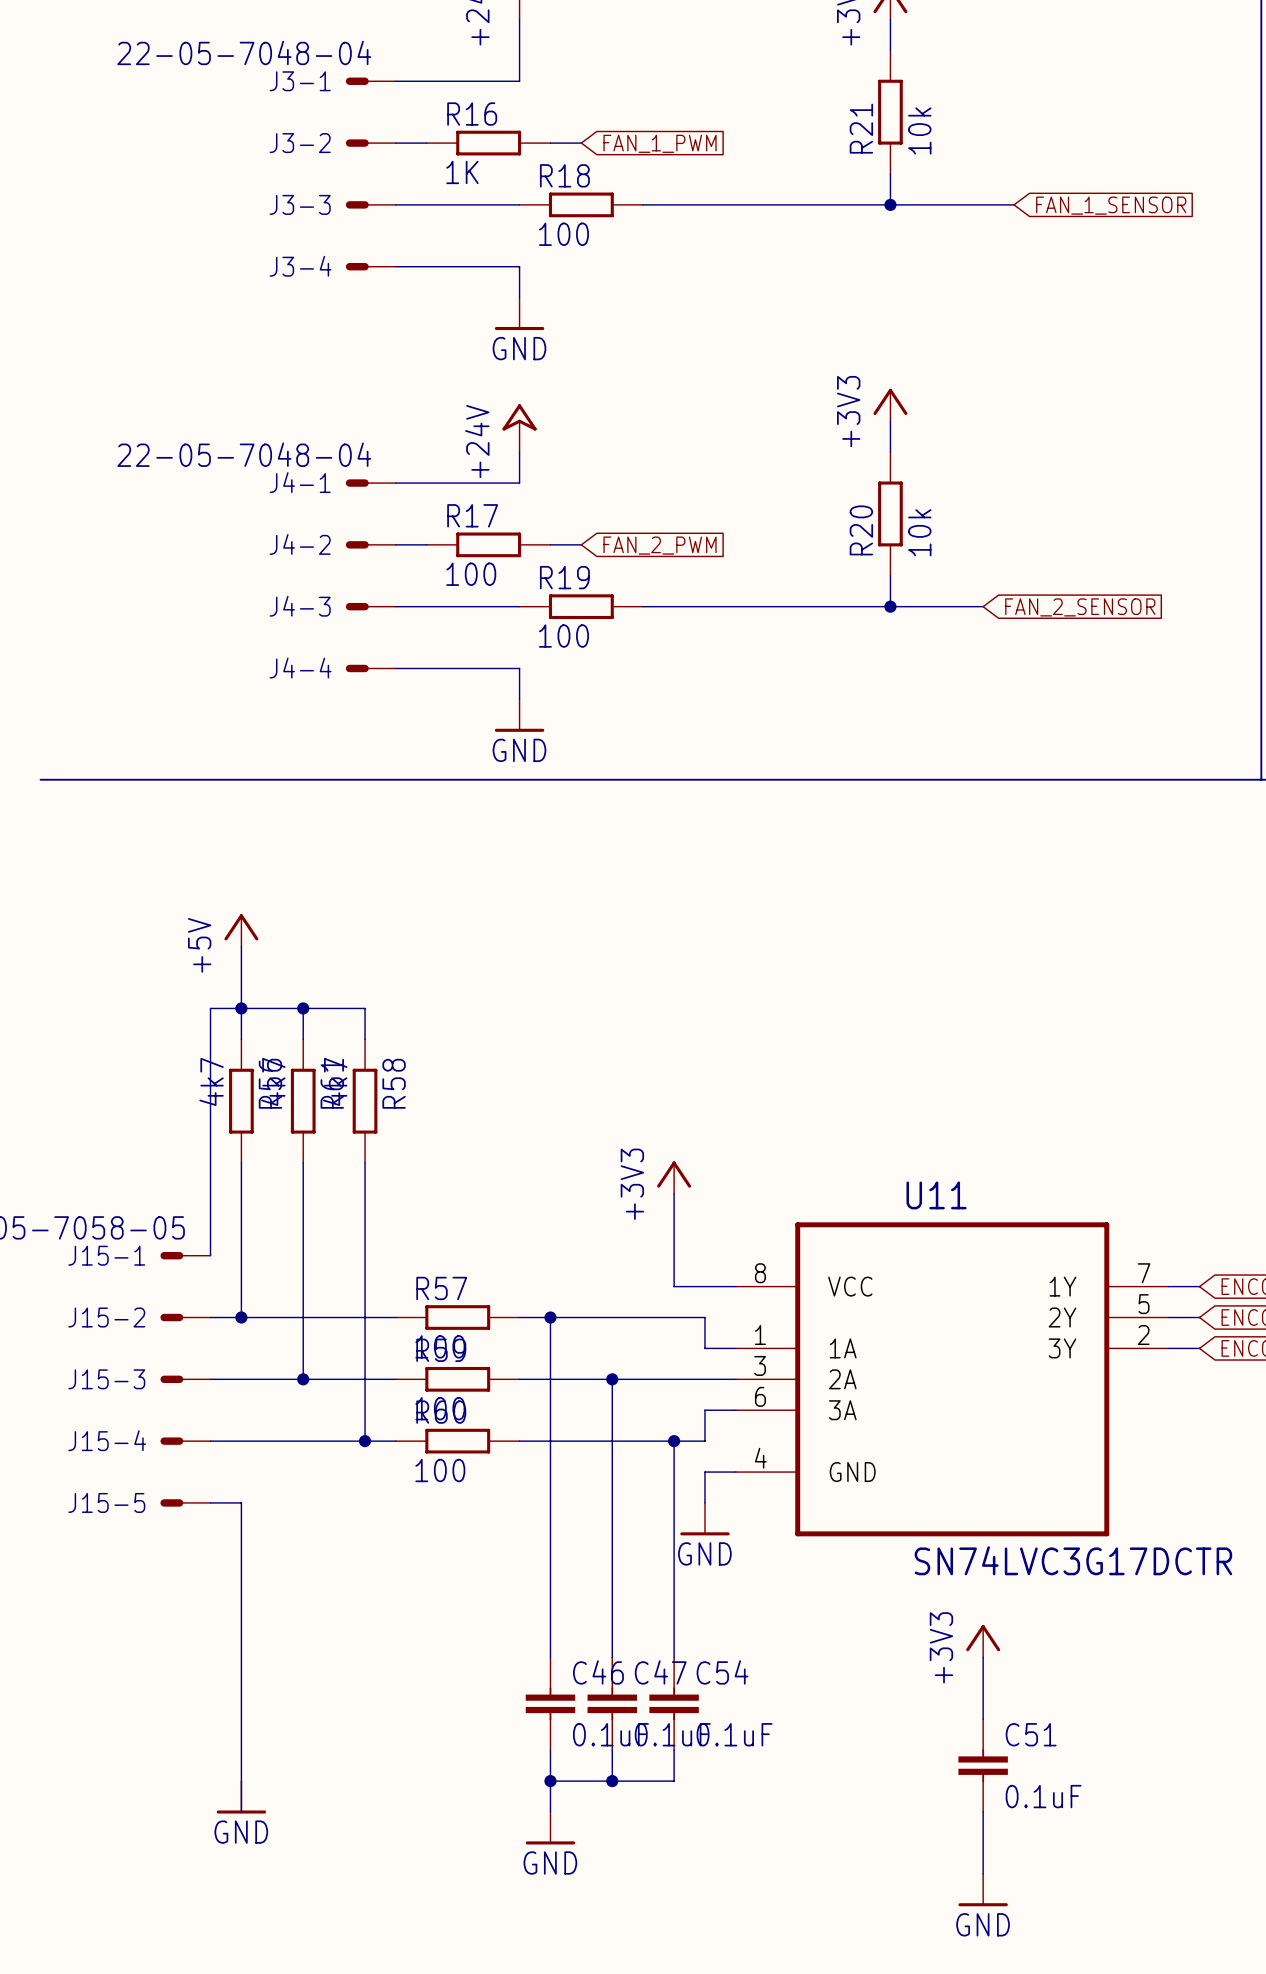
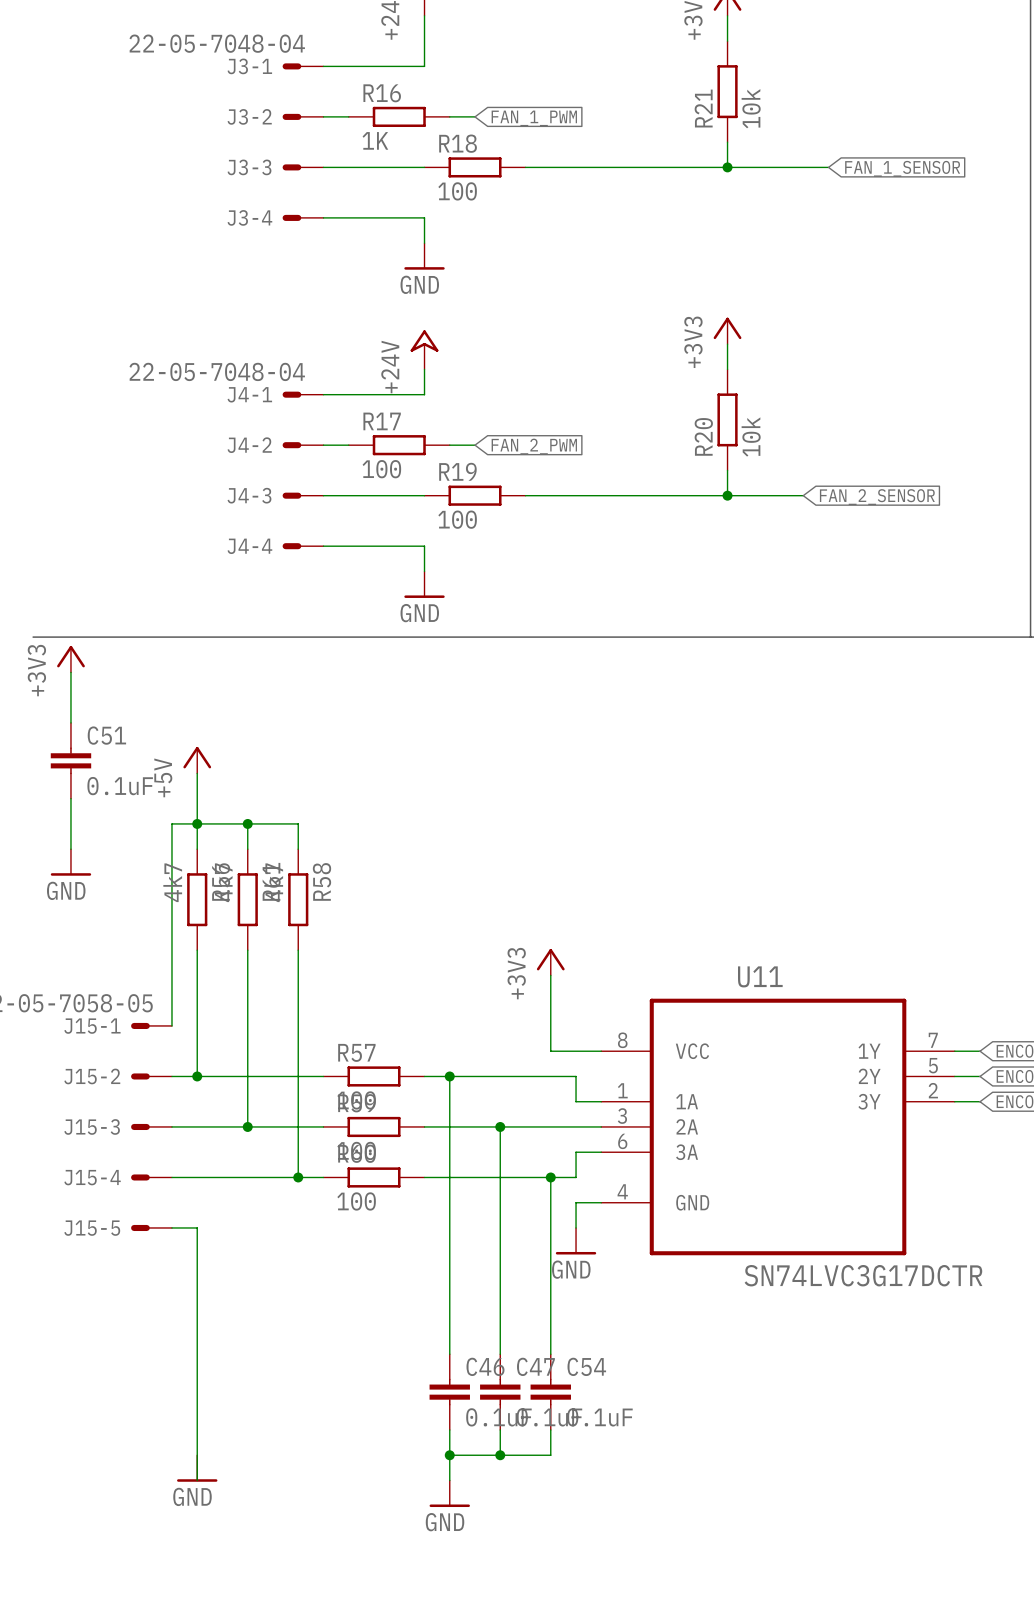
power symbol: none -> +3V3 (70, 659)
wire: none -> (70, 672) (70, 722)
wire: none -> (70, 798) (70, 849)
power symbol: none -> GND (70, 862)
power symbol: +3V3 (983, 1641) -> none
wire: (983, 1657) (983, 1719) -> none
C51 position: (983, 1765) -> (70, 760)
wire: (983, 1812) (983, 1873) -> none
power symbol: GND (983, 1890) -> none

